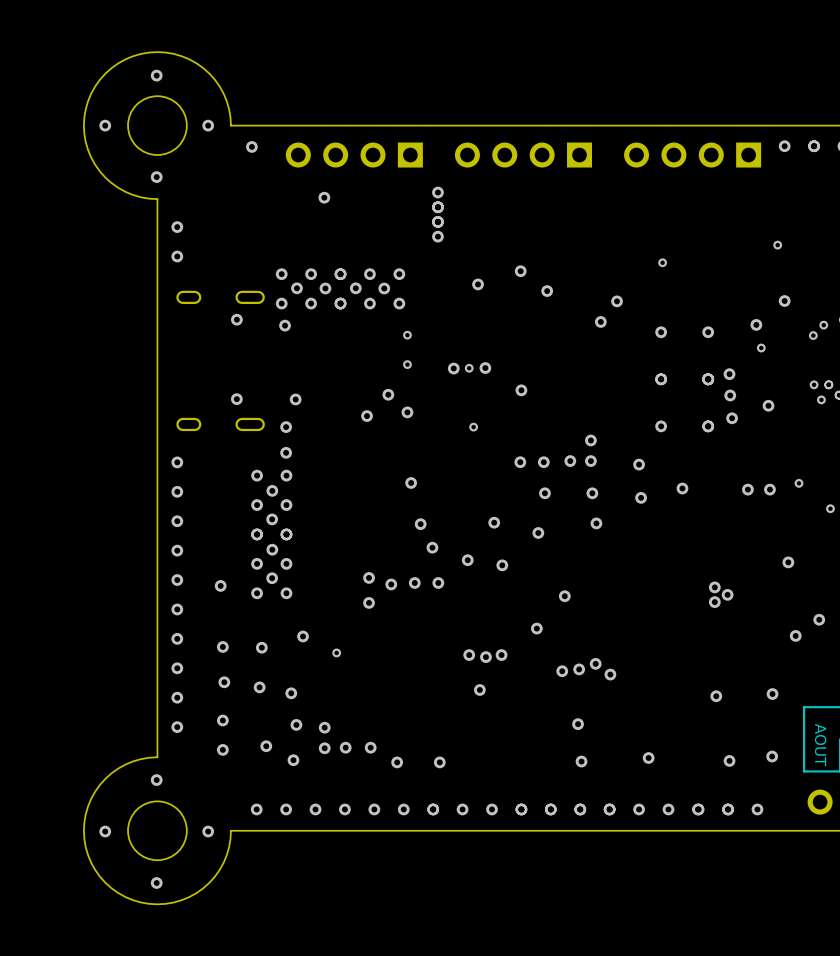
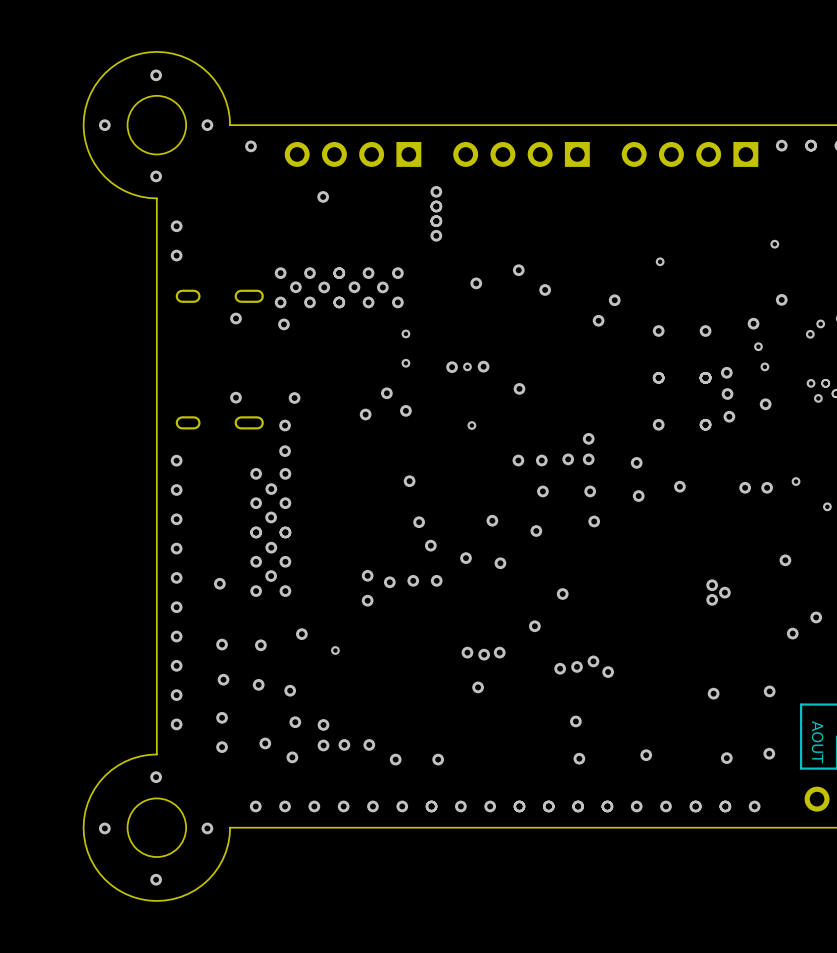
via: none -> (764, 366)

